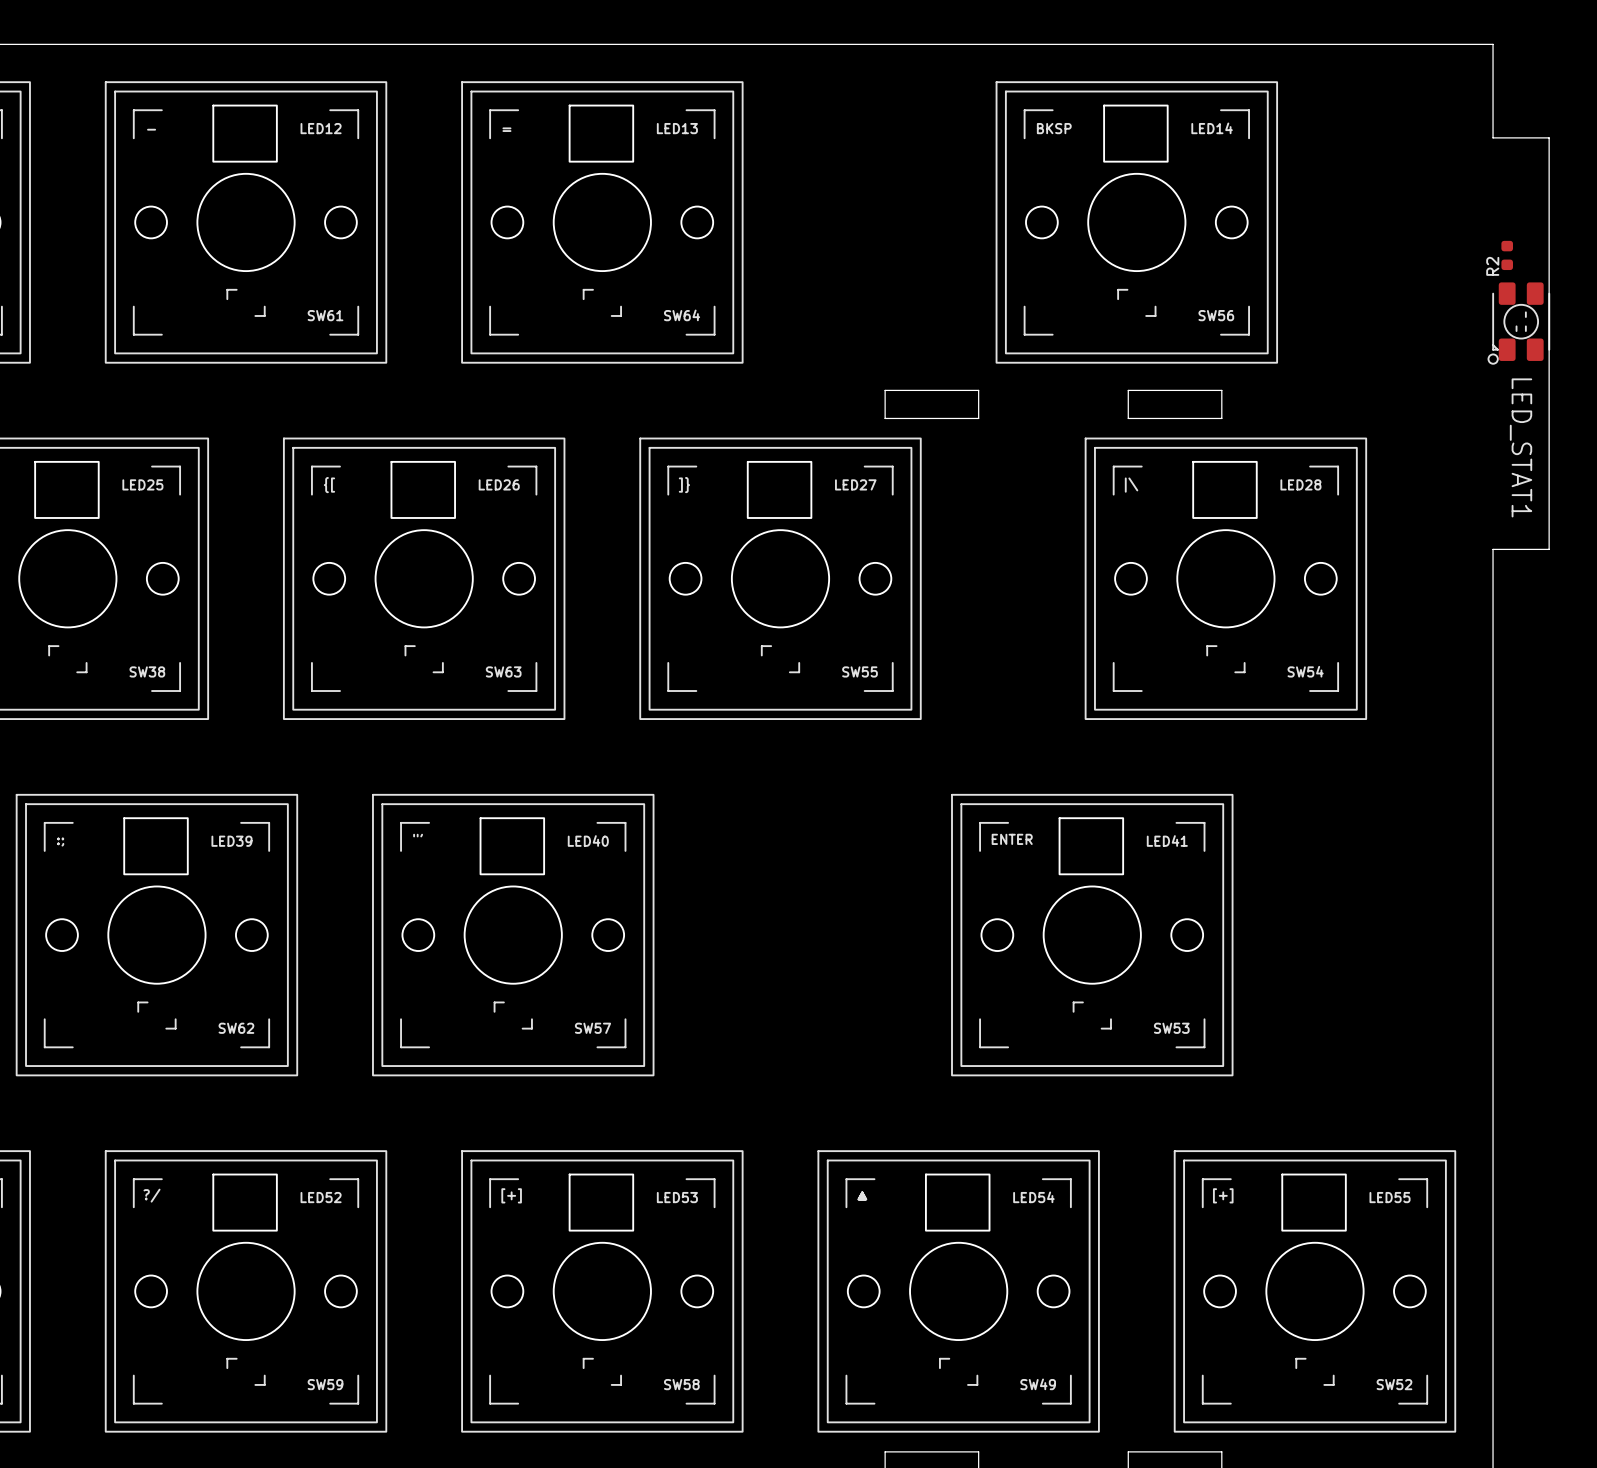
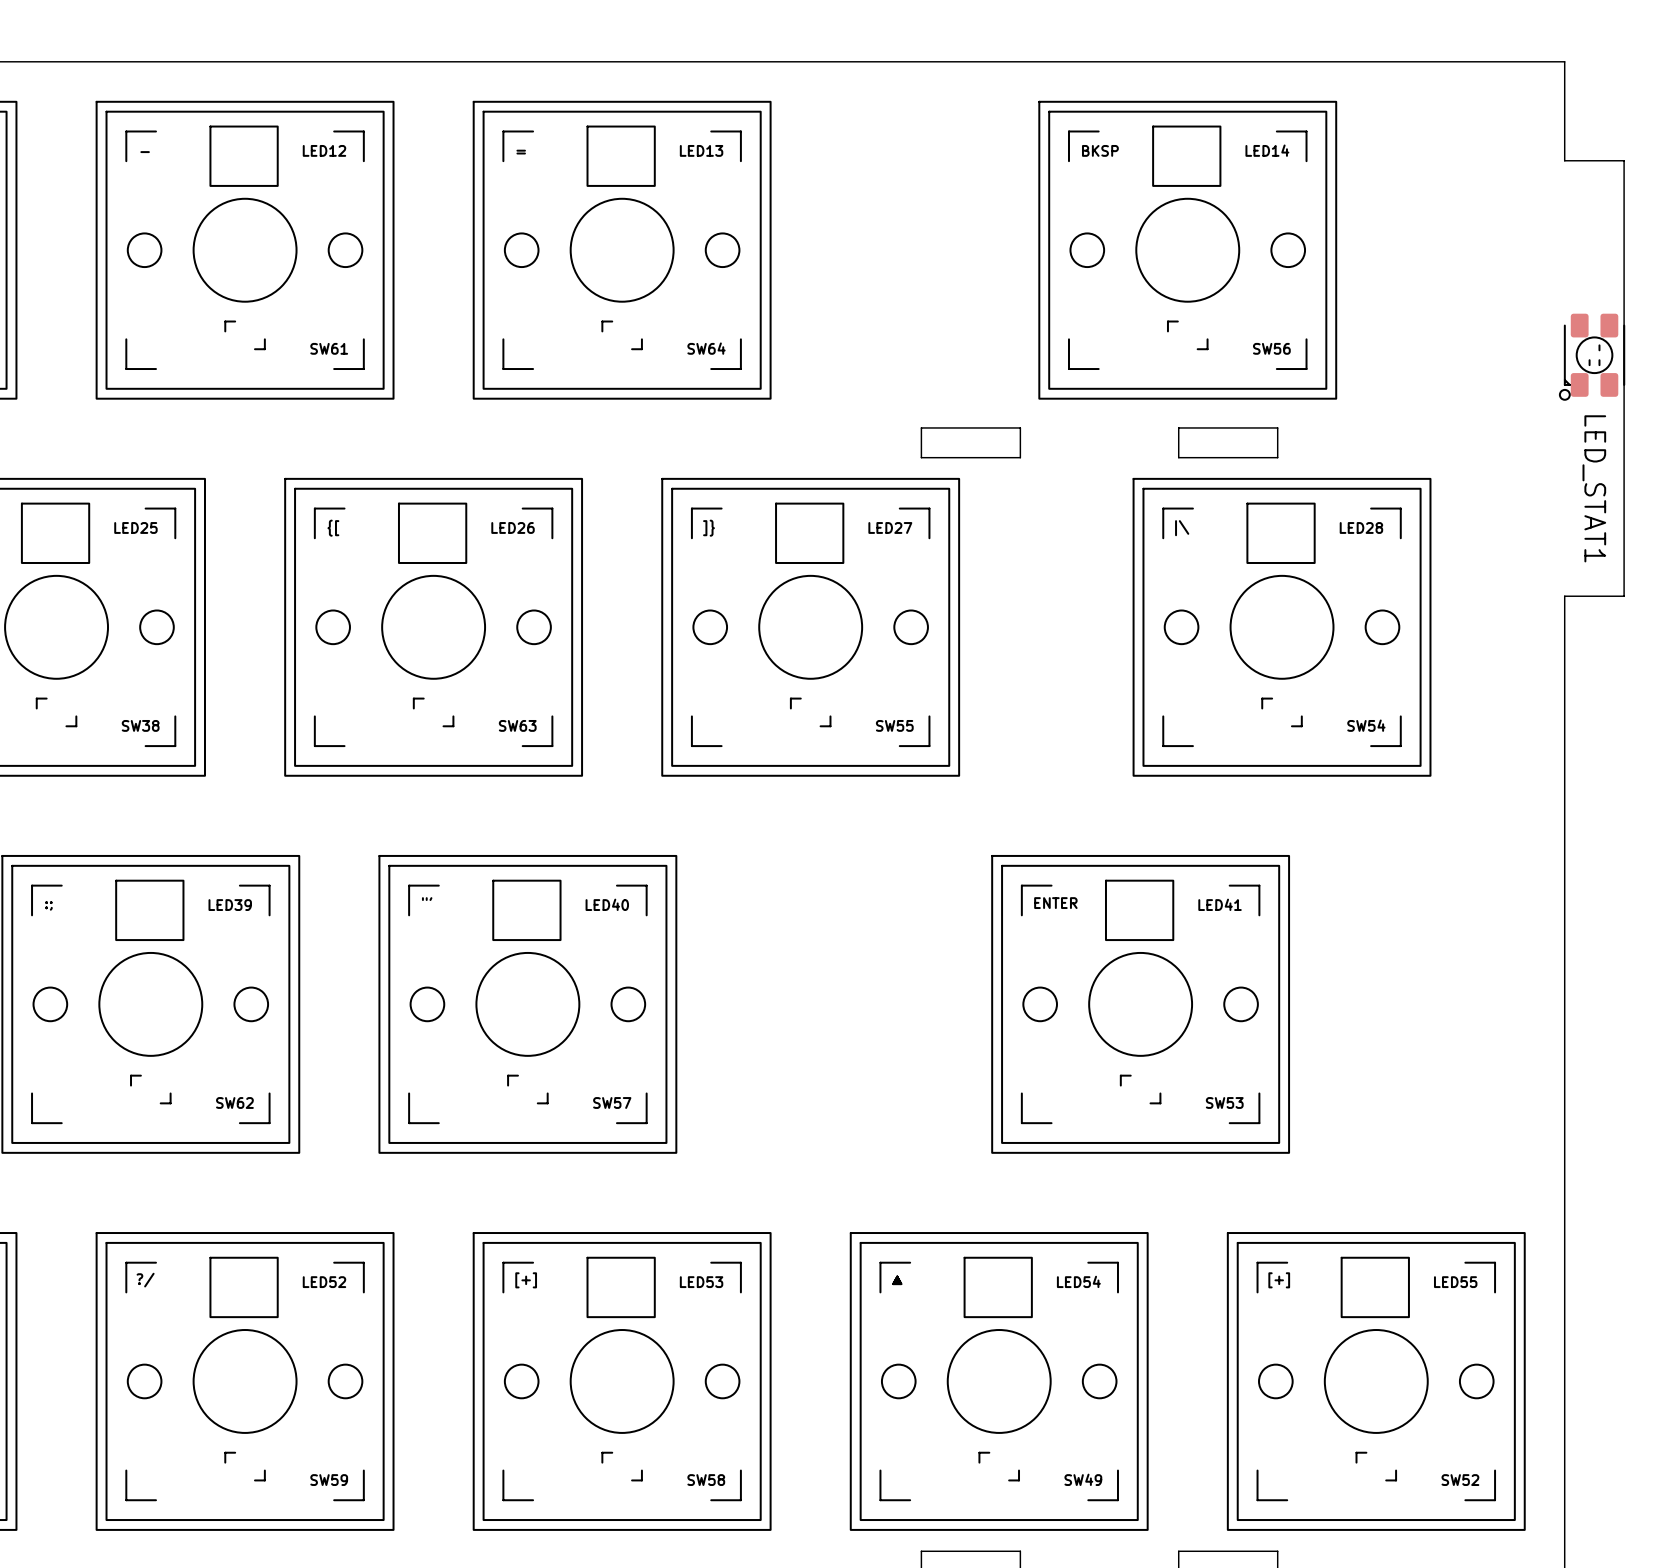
R2: (1507, 255) -> none

